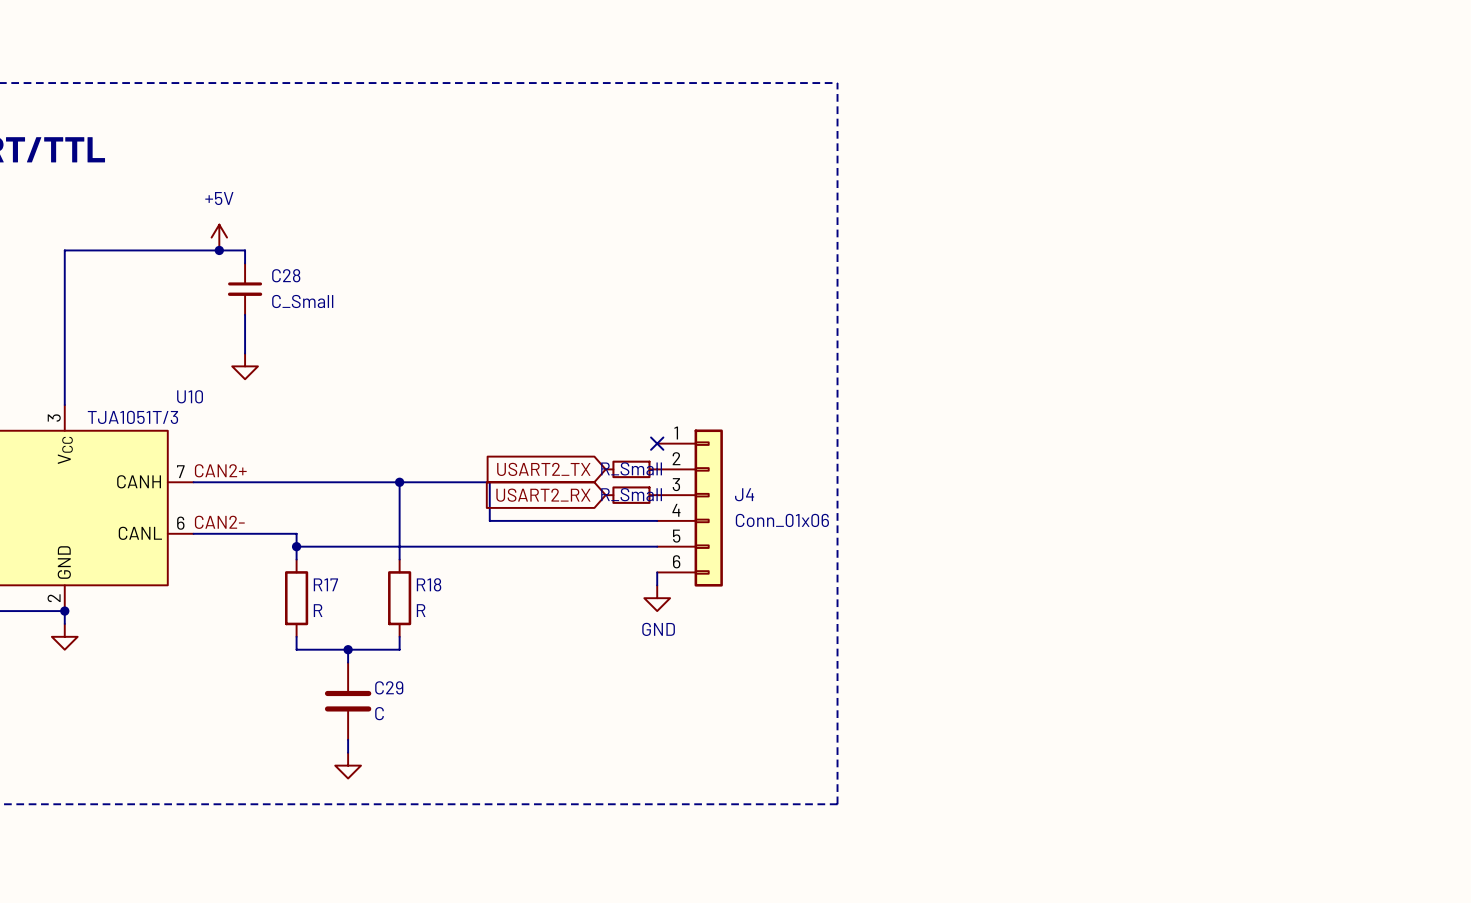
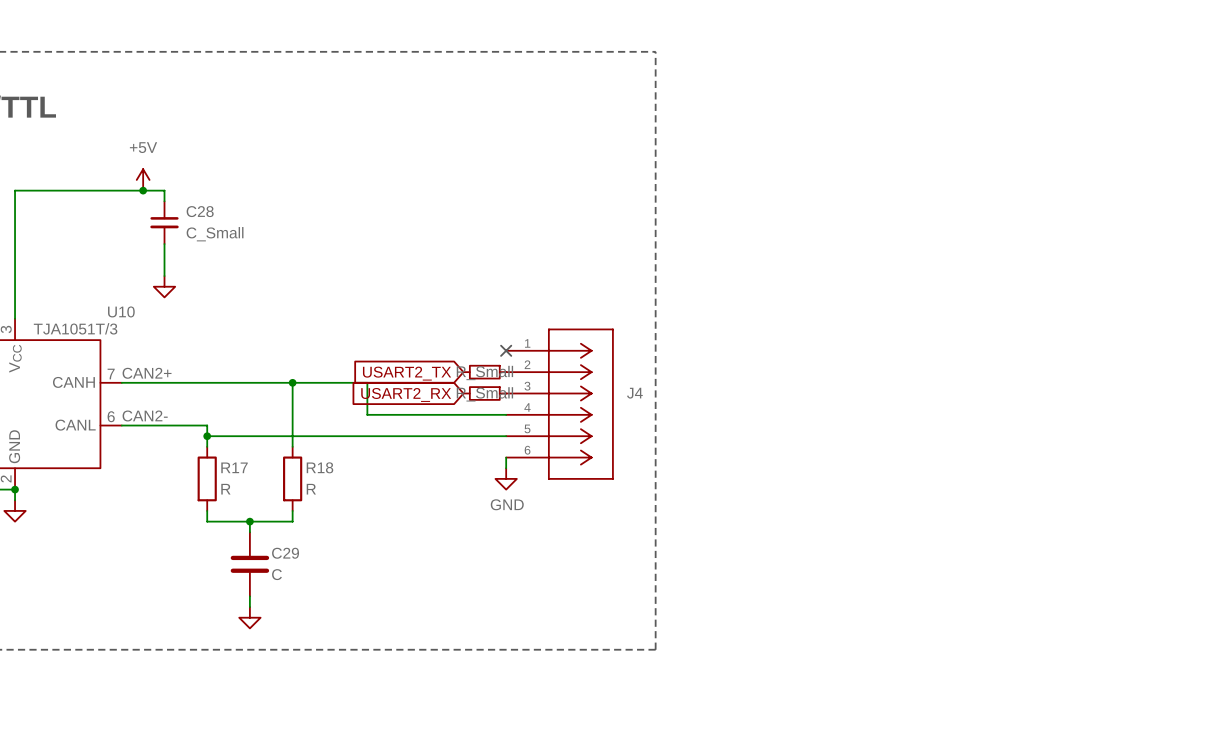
J4 symbol: [657, 429, 723, 587] -> [506, 328, 614, 480]
J4 name position: J4 (744, 494) -> J4 (634, 393)
J4 value: Conn_01x06 (782, 520) -> none

